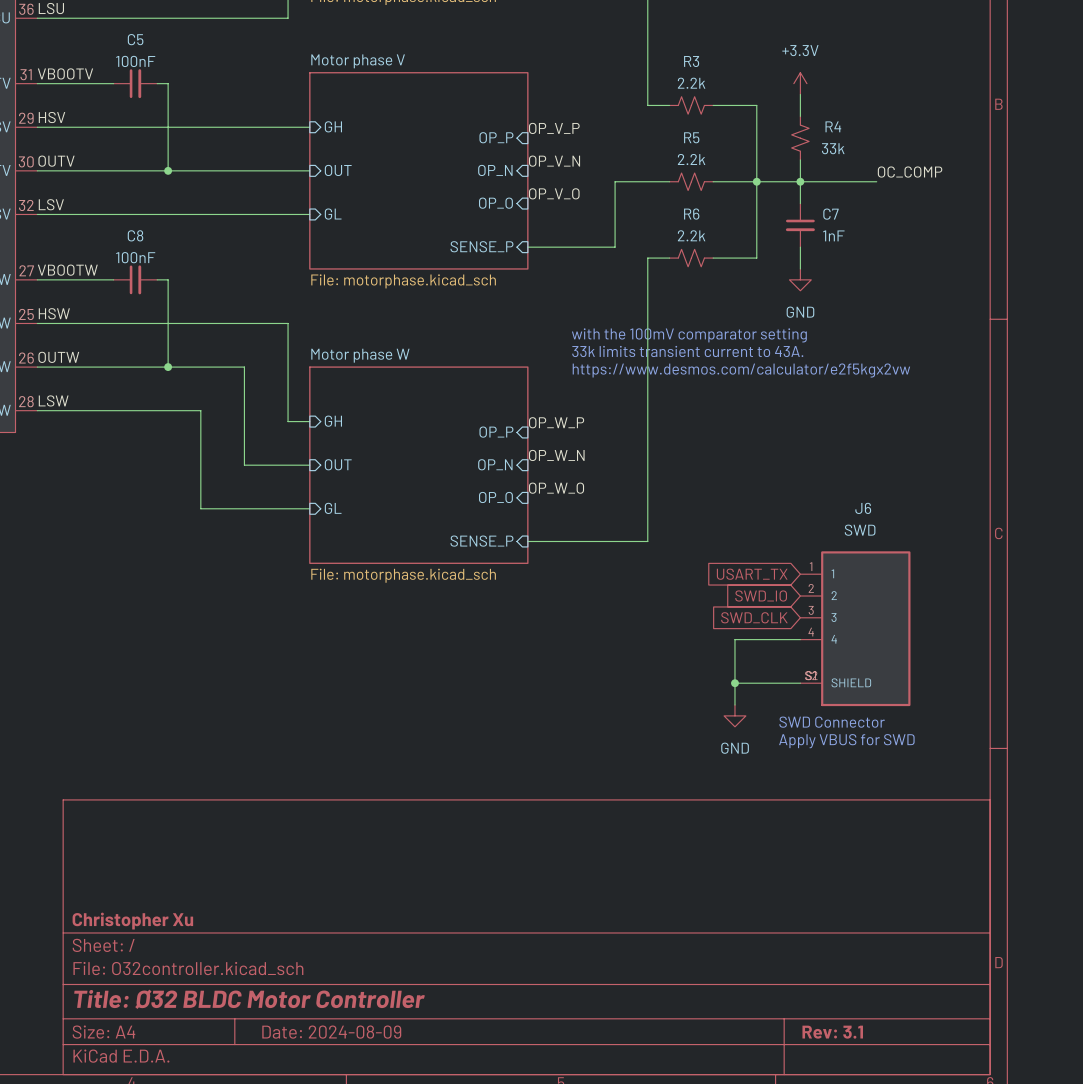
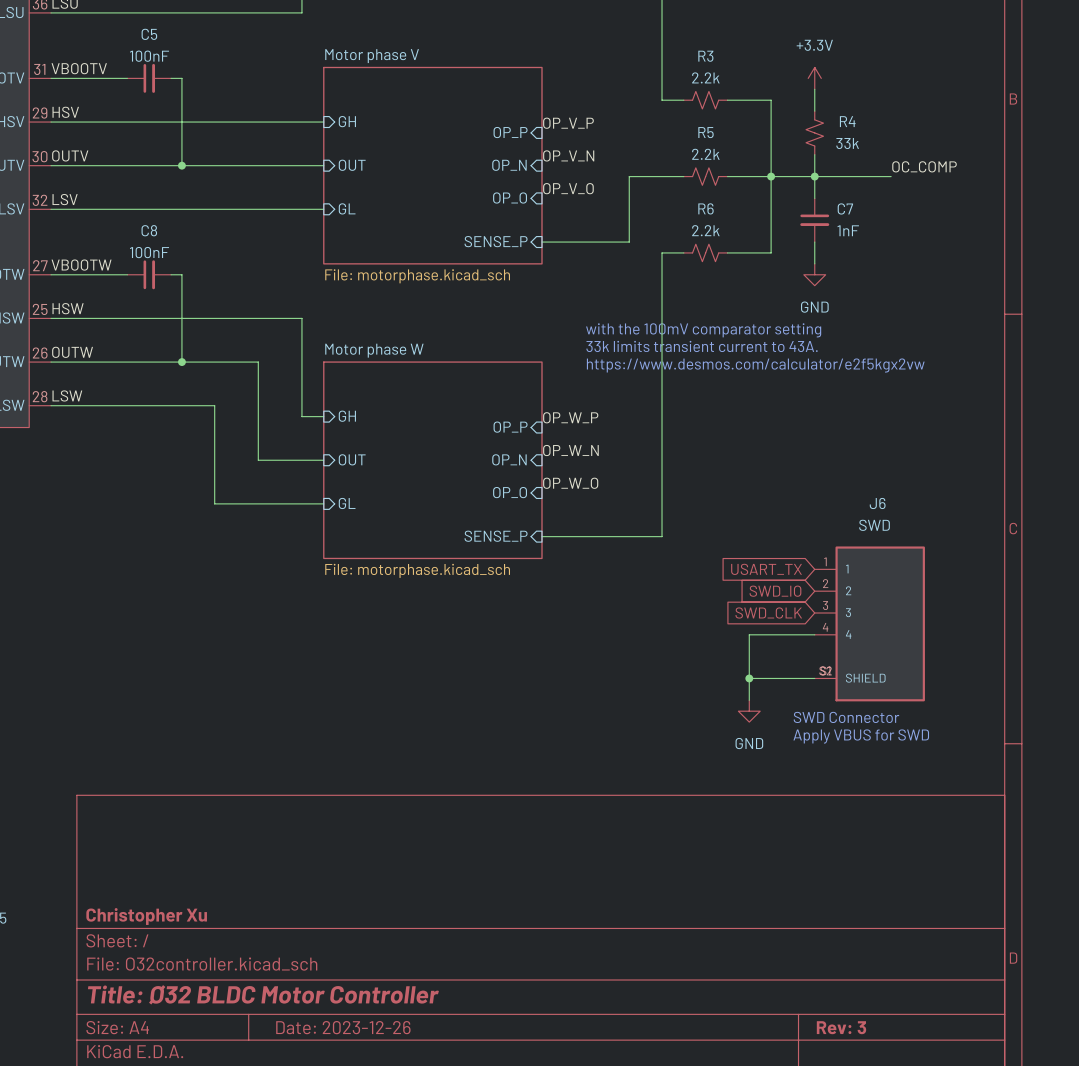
title block: Date: 2024-08-09 (331, 1032) -> Date: 2023-12-26 (343, 1027)
title block: Rev: 3.1 (832, 1032) -> Rev: 3 (841, 1027)

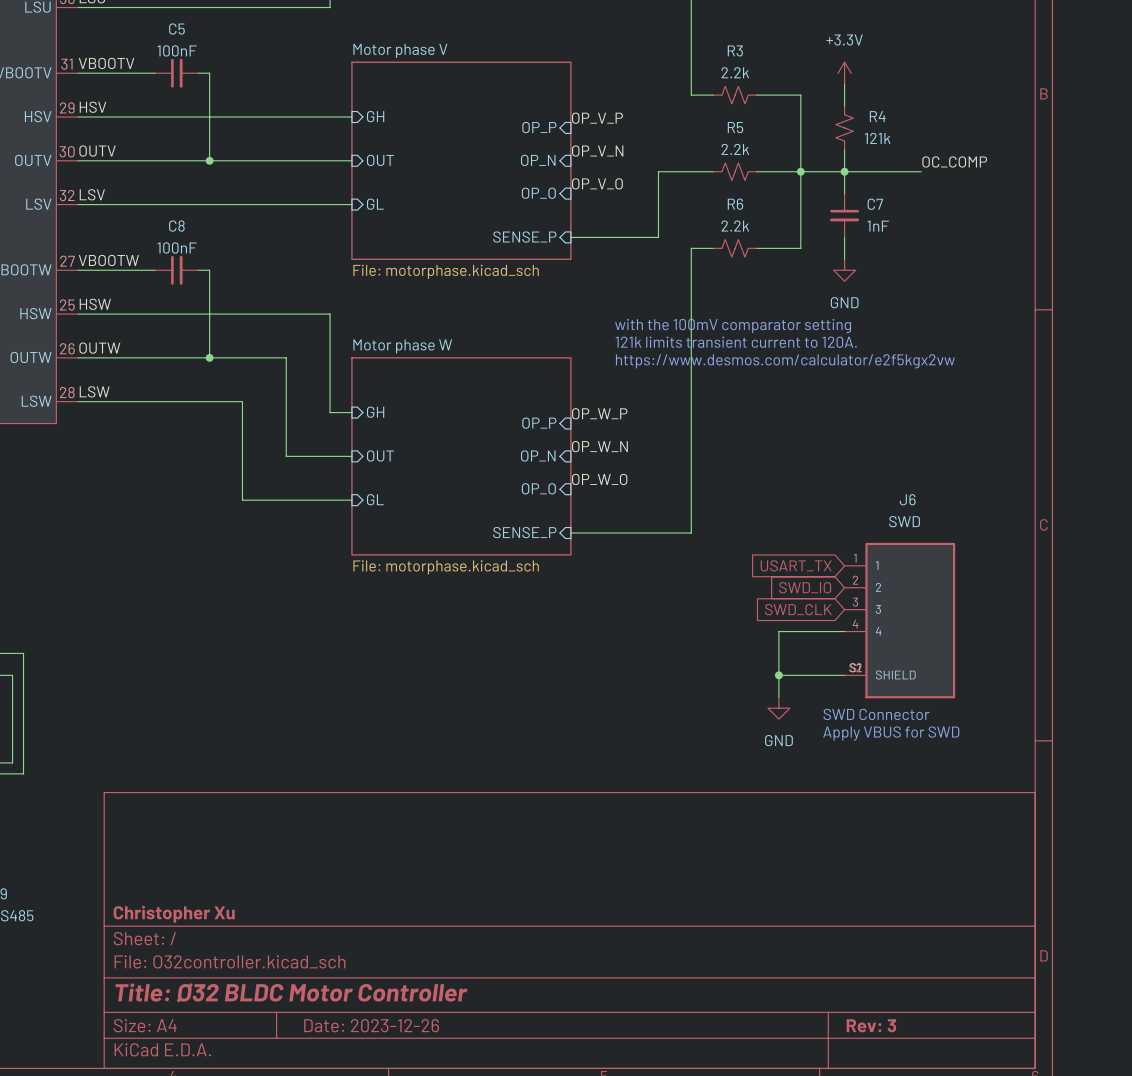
R4 value: 33k (847, 143) -> 121k (877, 138)
text: 33k limits transient current to 43A. (702, 346) -> 121k limits transient current to 120A. (736, 342)

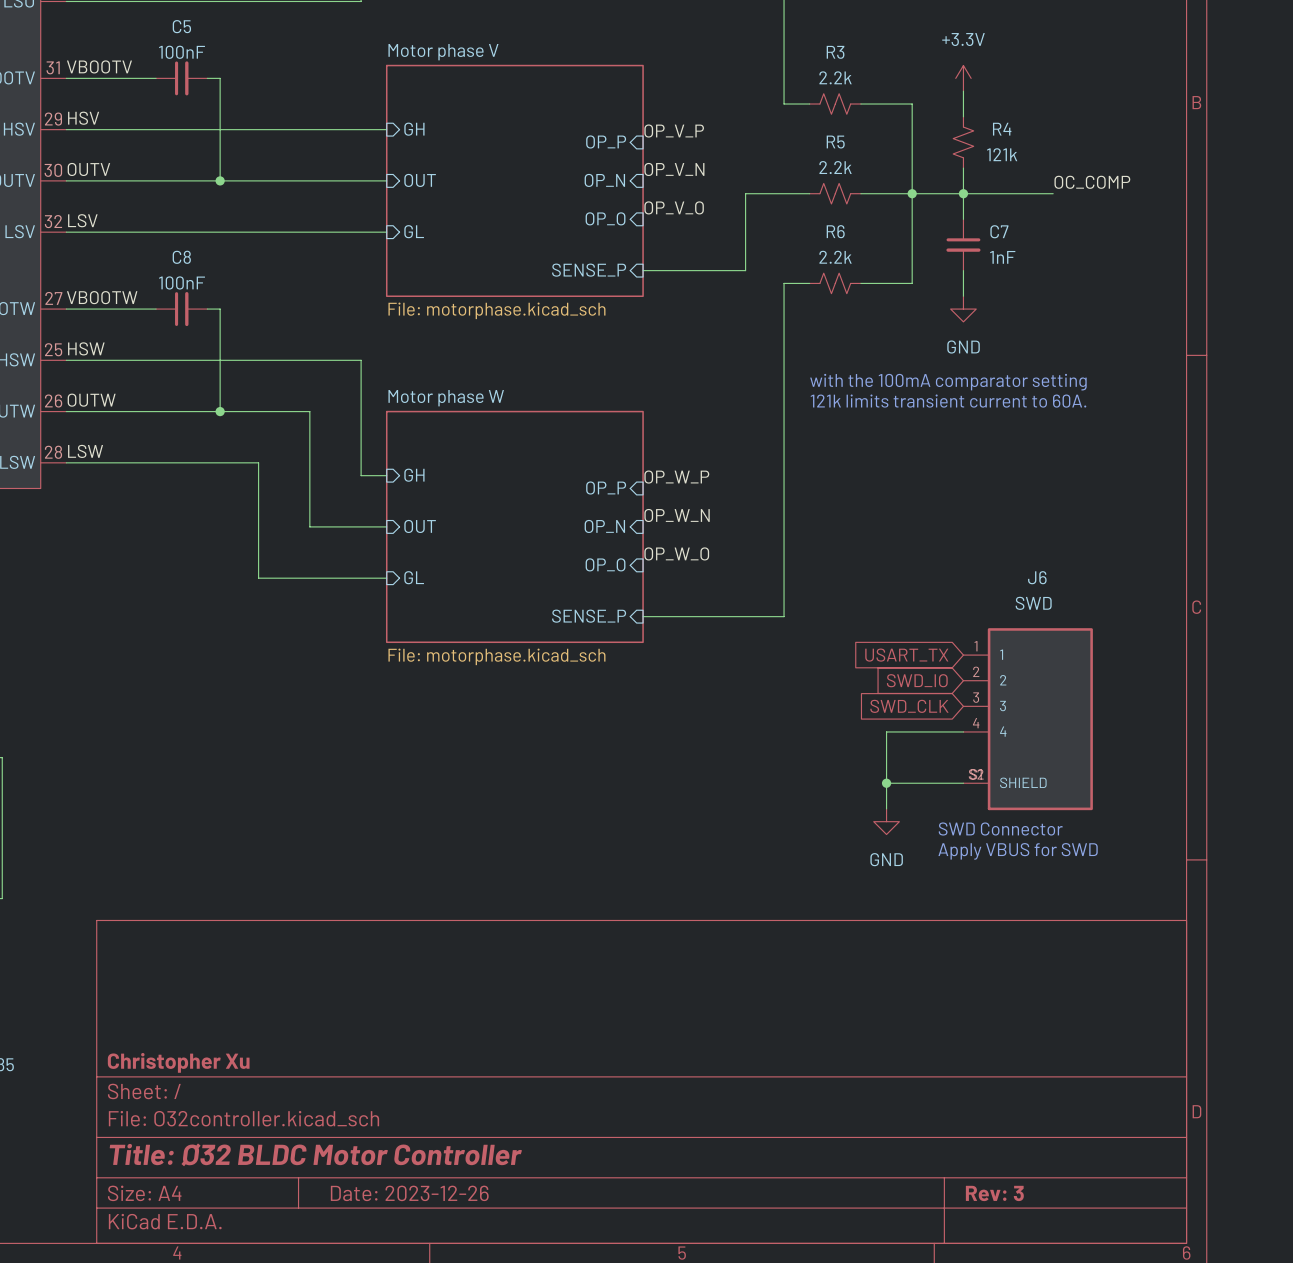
text: with the 100mV comparator setting (733, 326) -> with the 100mA comparator setting (948, 382)
text: 121k limits transient current to 120A. (736, 342) -> 121k limits transient current to 60A. (948, 401)
text: https://www.desmos.com/calculator/e2f5kgx2vw (785, 361) -> none

